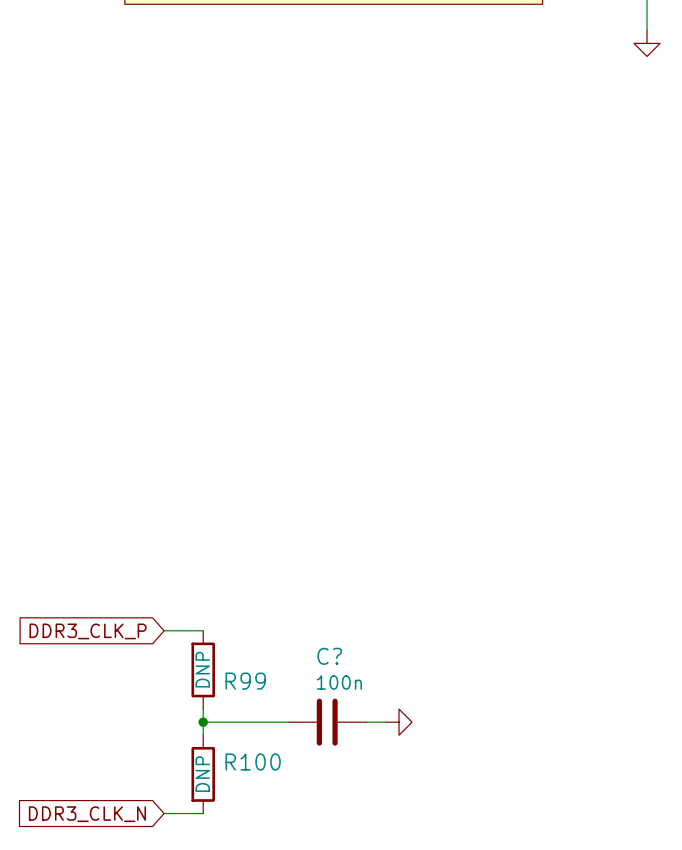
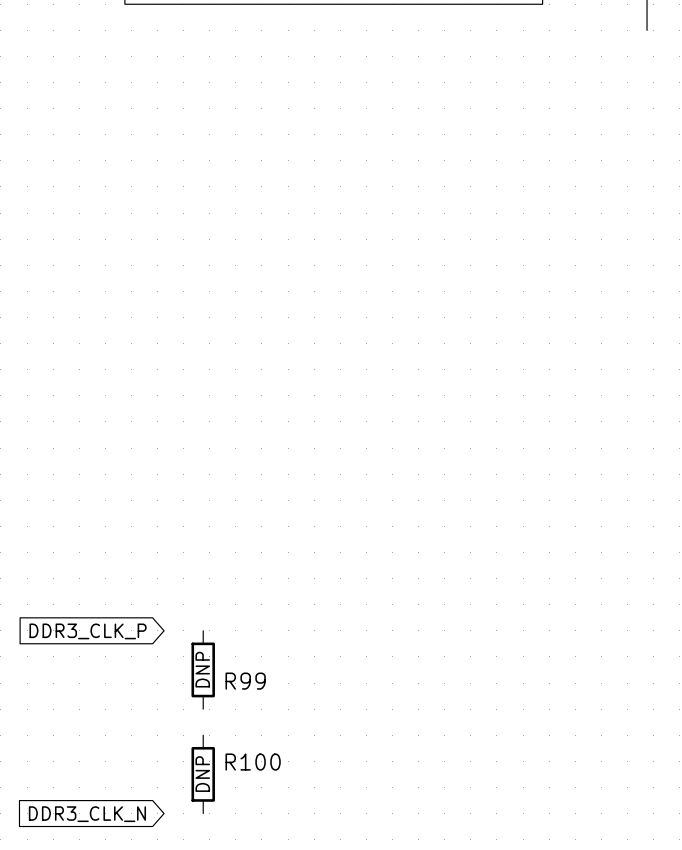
power symbol: (647, 43) -> none
wire: (164, 630) (203, 630) -> none
wire: (203, 709) (203, 735) -> none
wire: (203, 722) (288, 722) -> none
junction: (203, 722) -> none
C?: (327, 722) -> none
wire: (366, 722) (385, 722) -> none
power symbol: (399, 722) -> none
wire: (164, 813) (203, 813) -> none

